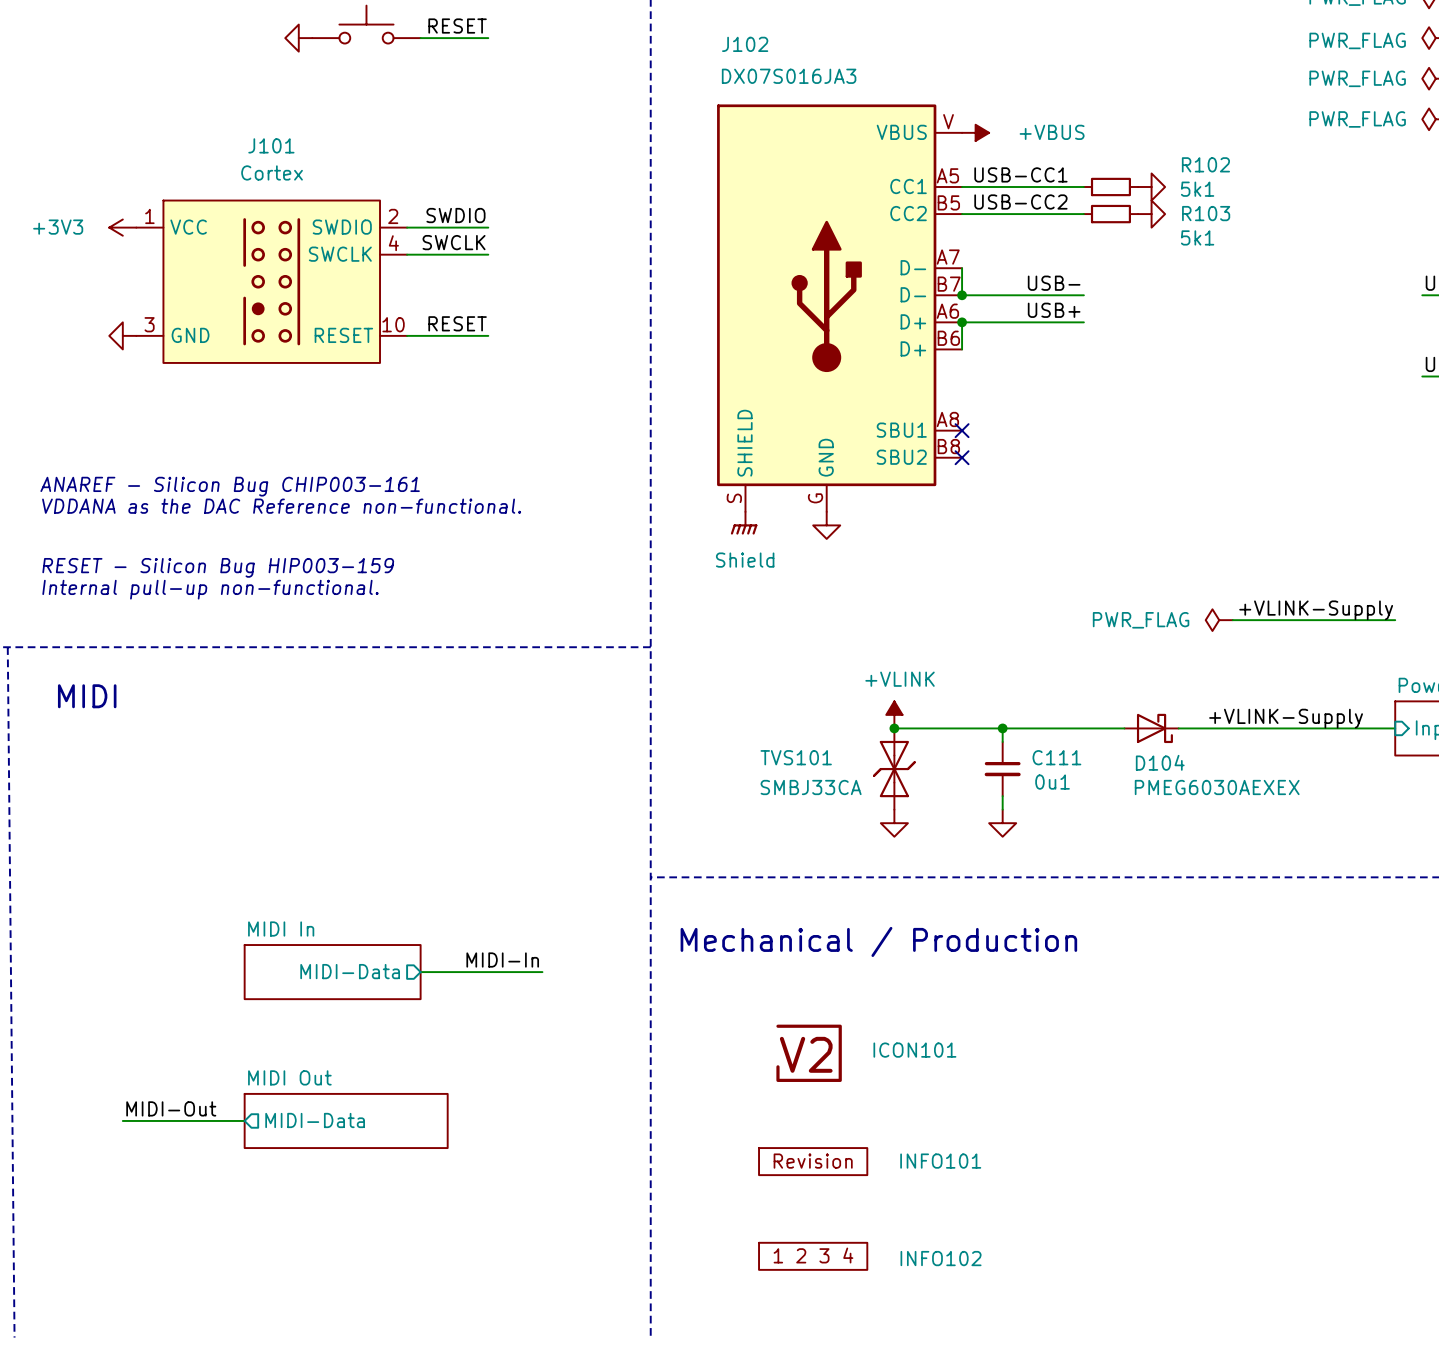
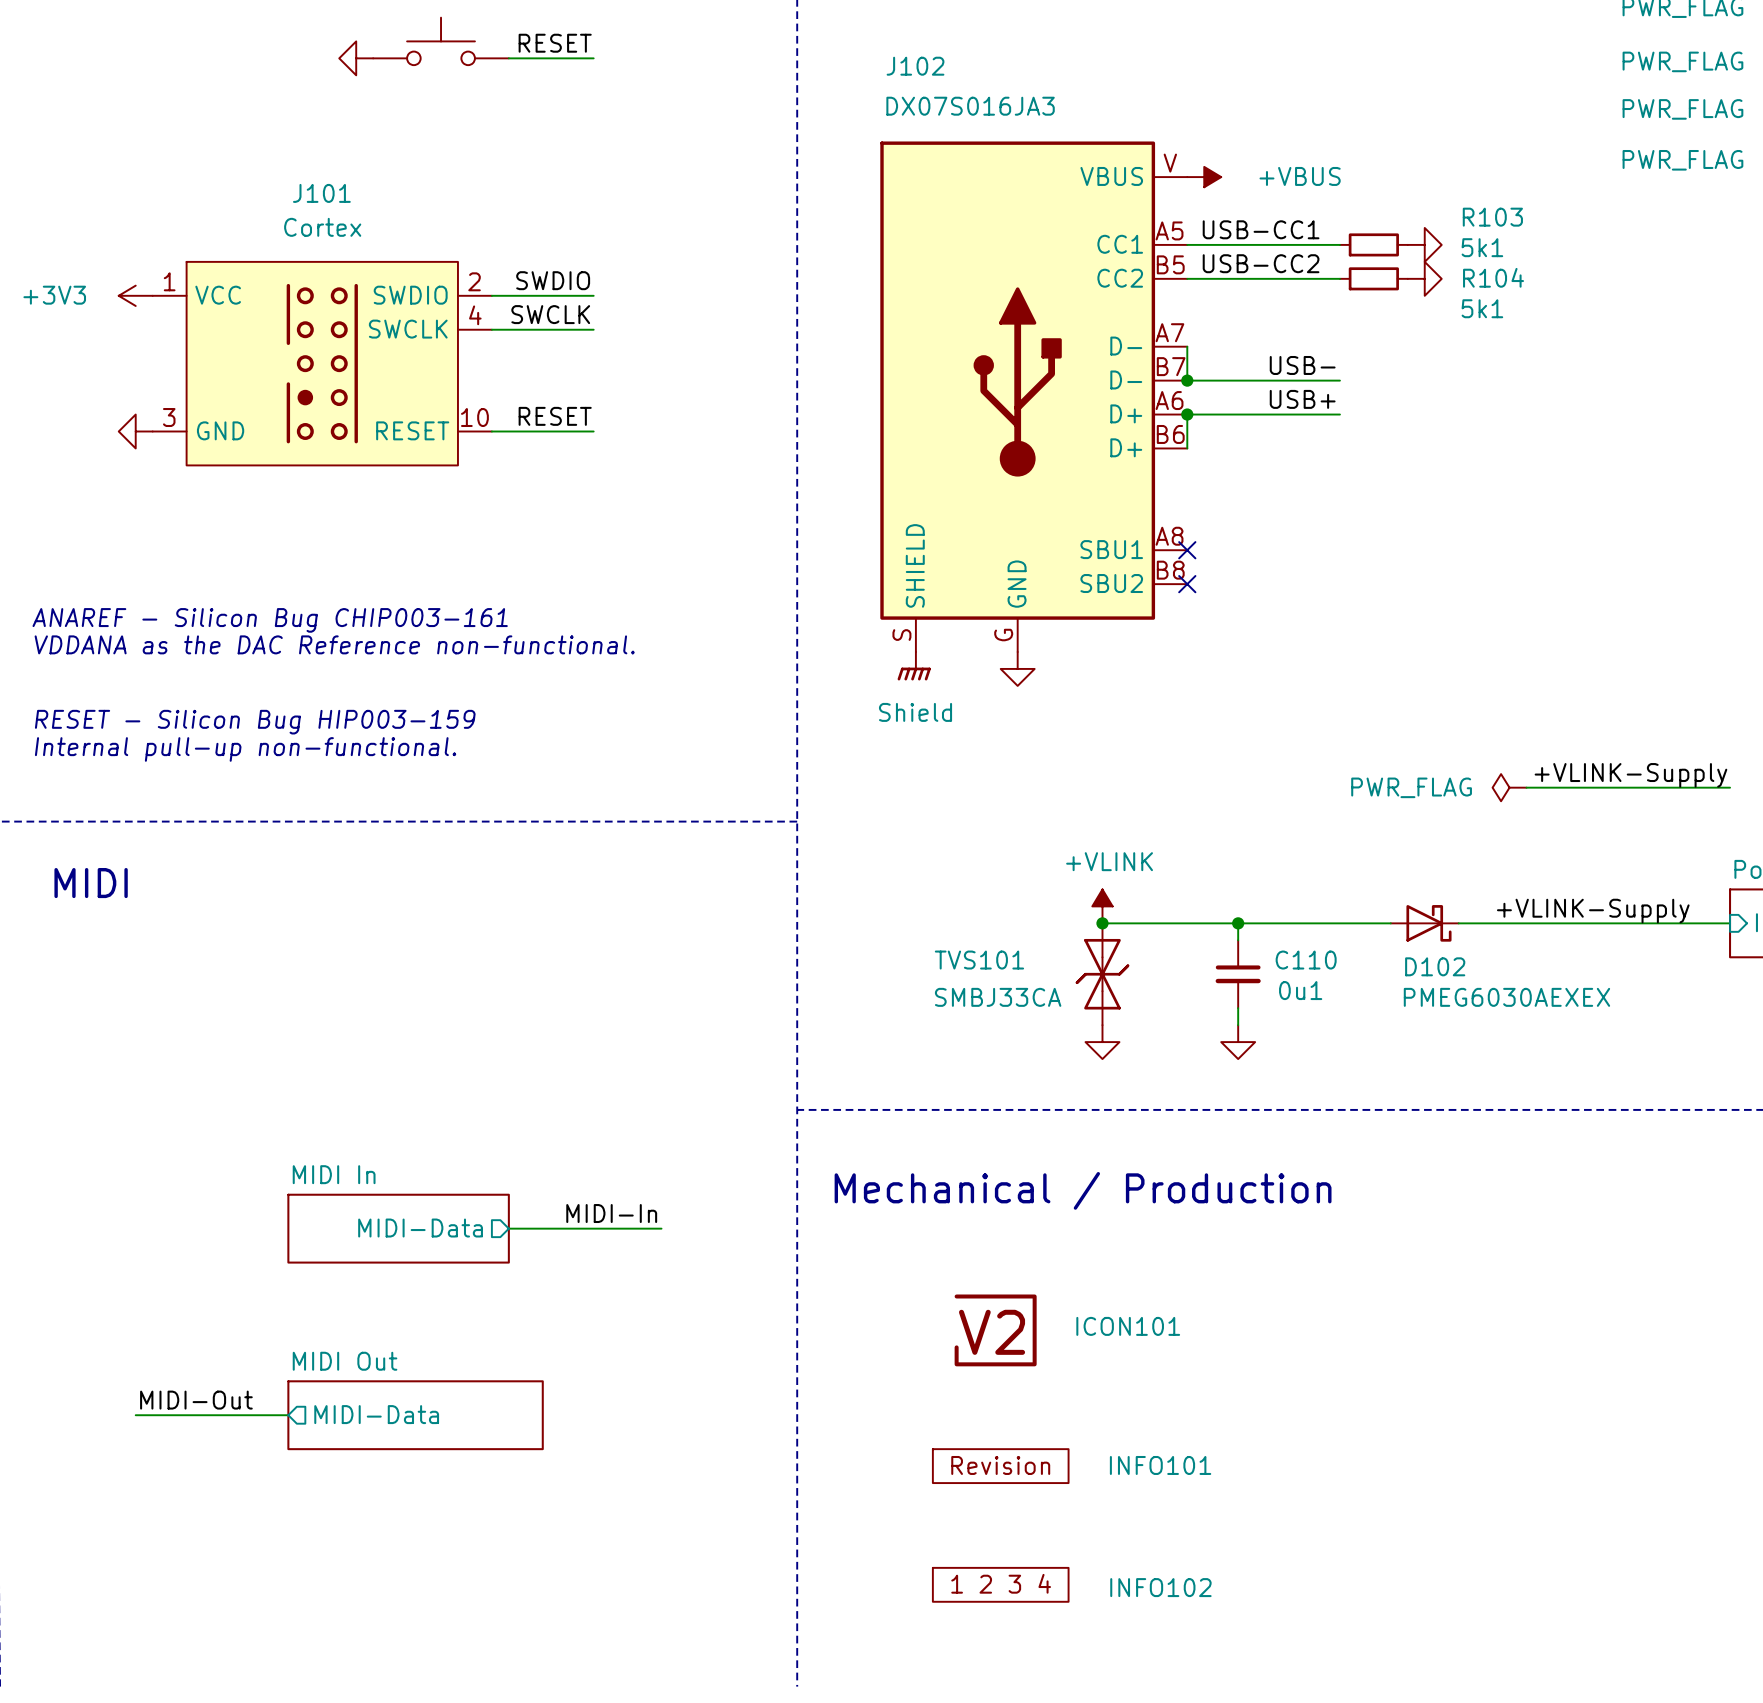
R102 name: R102 (1205, 164) -> R103 (1492, 217)
R103 name: R103 (1206, 213) -> R104 (1493, 277)
C111 name: C111 (1056, 757) -> C110 (1306, 960)
D104 name: D104 (1160, 762) -> D102 (1435, 966)

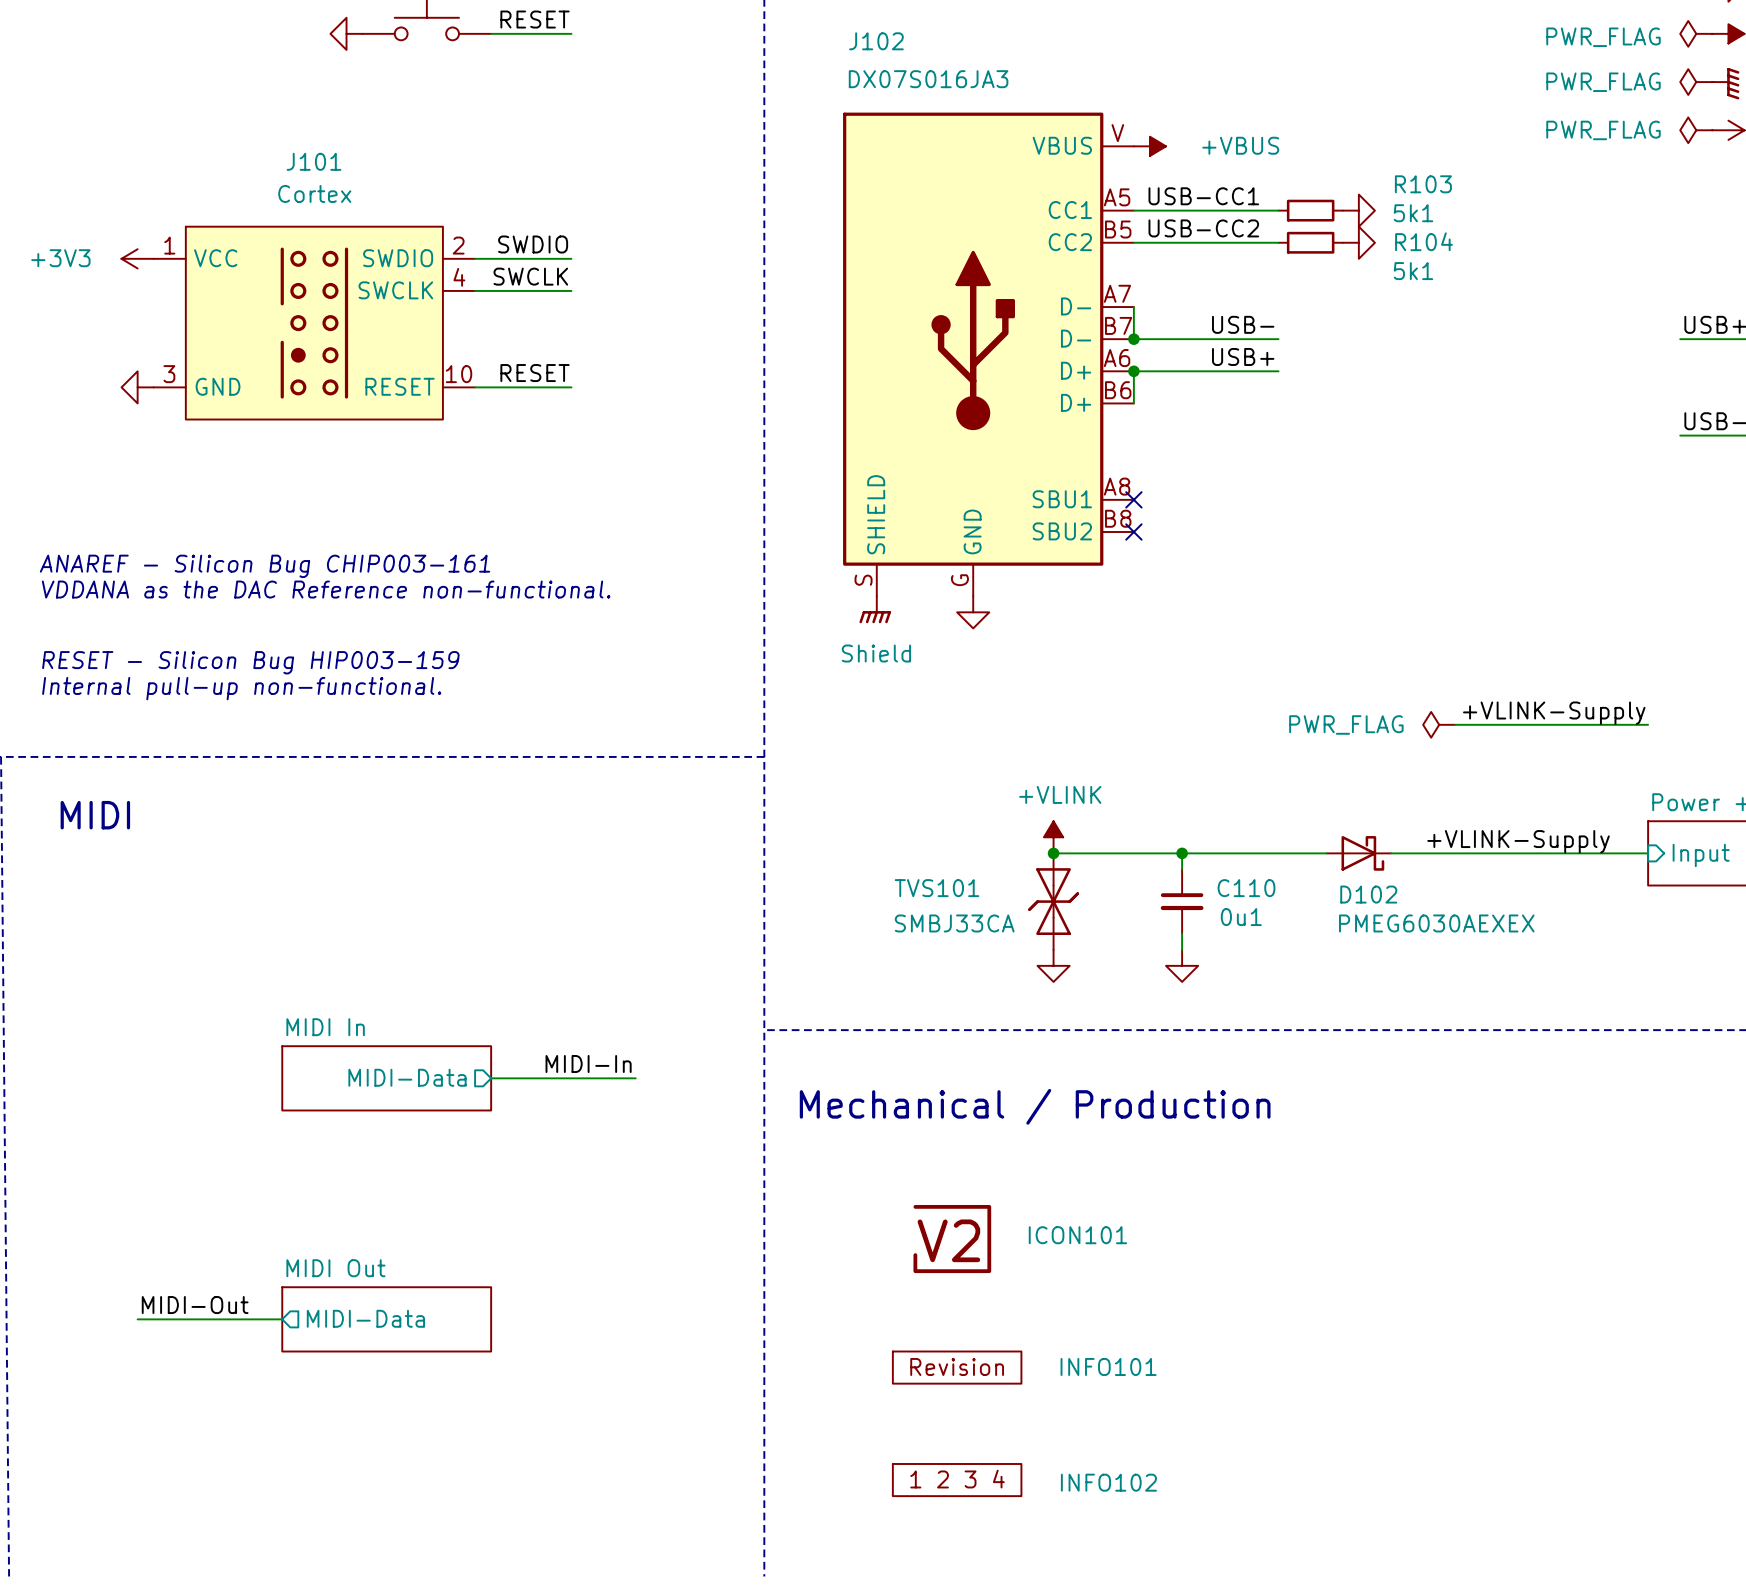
label position: MIDI-In (611, 1213) -> MIDI-In (588, 1064)
sheet MIDI In position: (398, 1228) -> (386, 1078)
sheet pin position: MIDI-Data (420, 1228) -> MIDI-Data (407, 1077)
wire: (508, 1228) (661, 1228) -> (491, 1078) (635, 1078)
sheet MIDI Out: none -> (386, 1319)
sheet MIDI Out: (415, 1415) -> none

